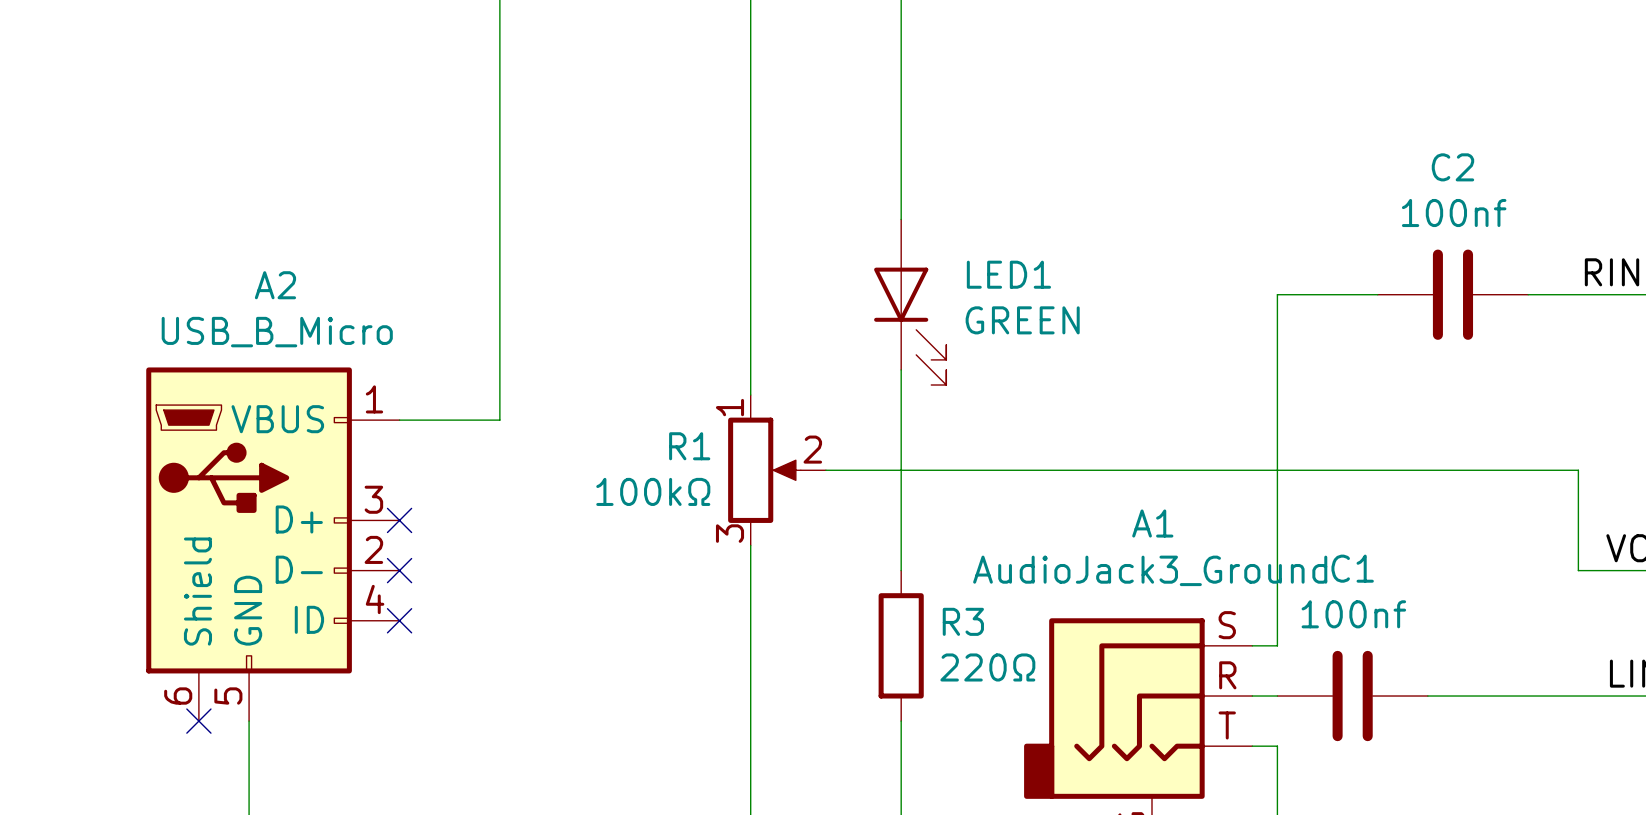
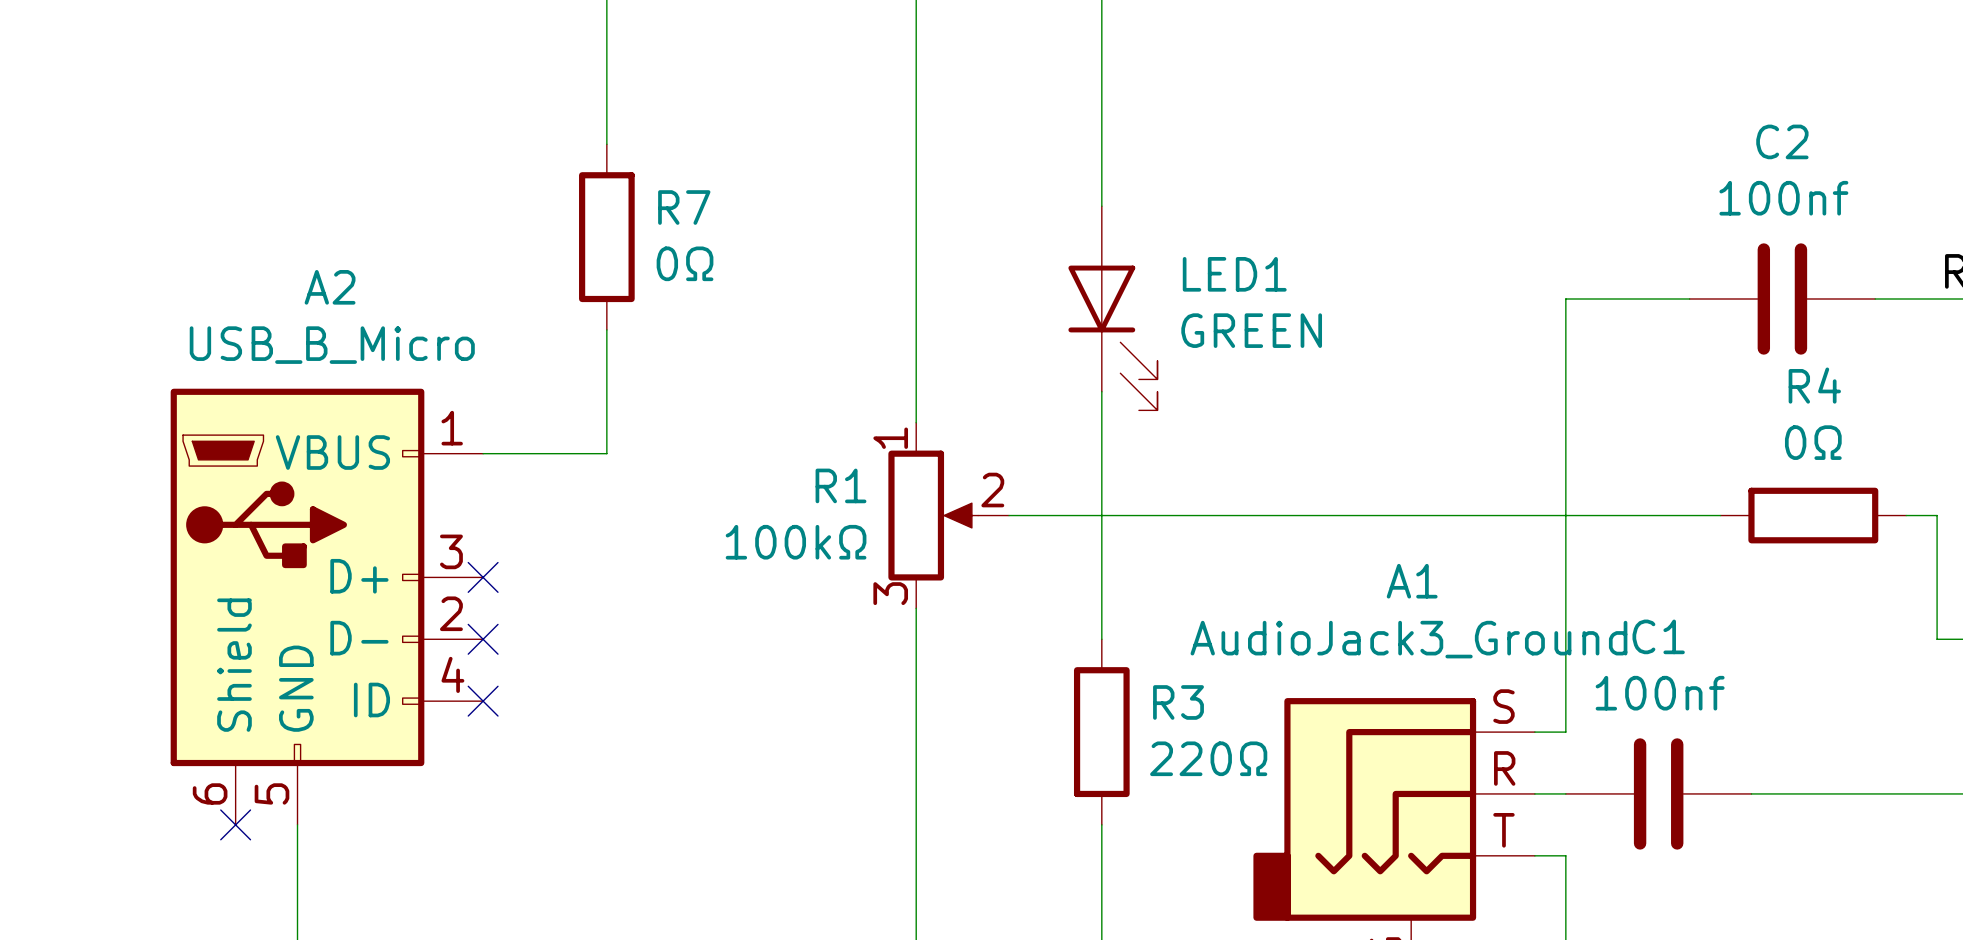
wire: (499, 169) (499, 319) -> none
R7: none -> 0Ω (606, 237)
wire: (1402, 470) (1553, 470) -> none
R4: none -> 0Ω (1813, 515)

